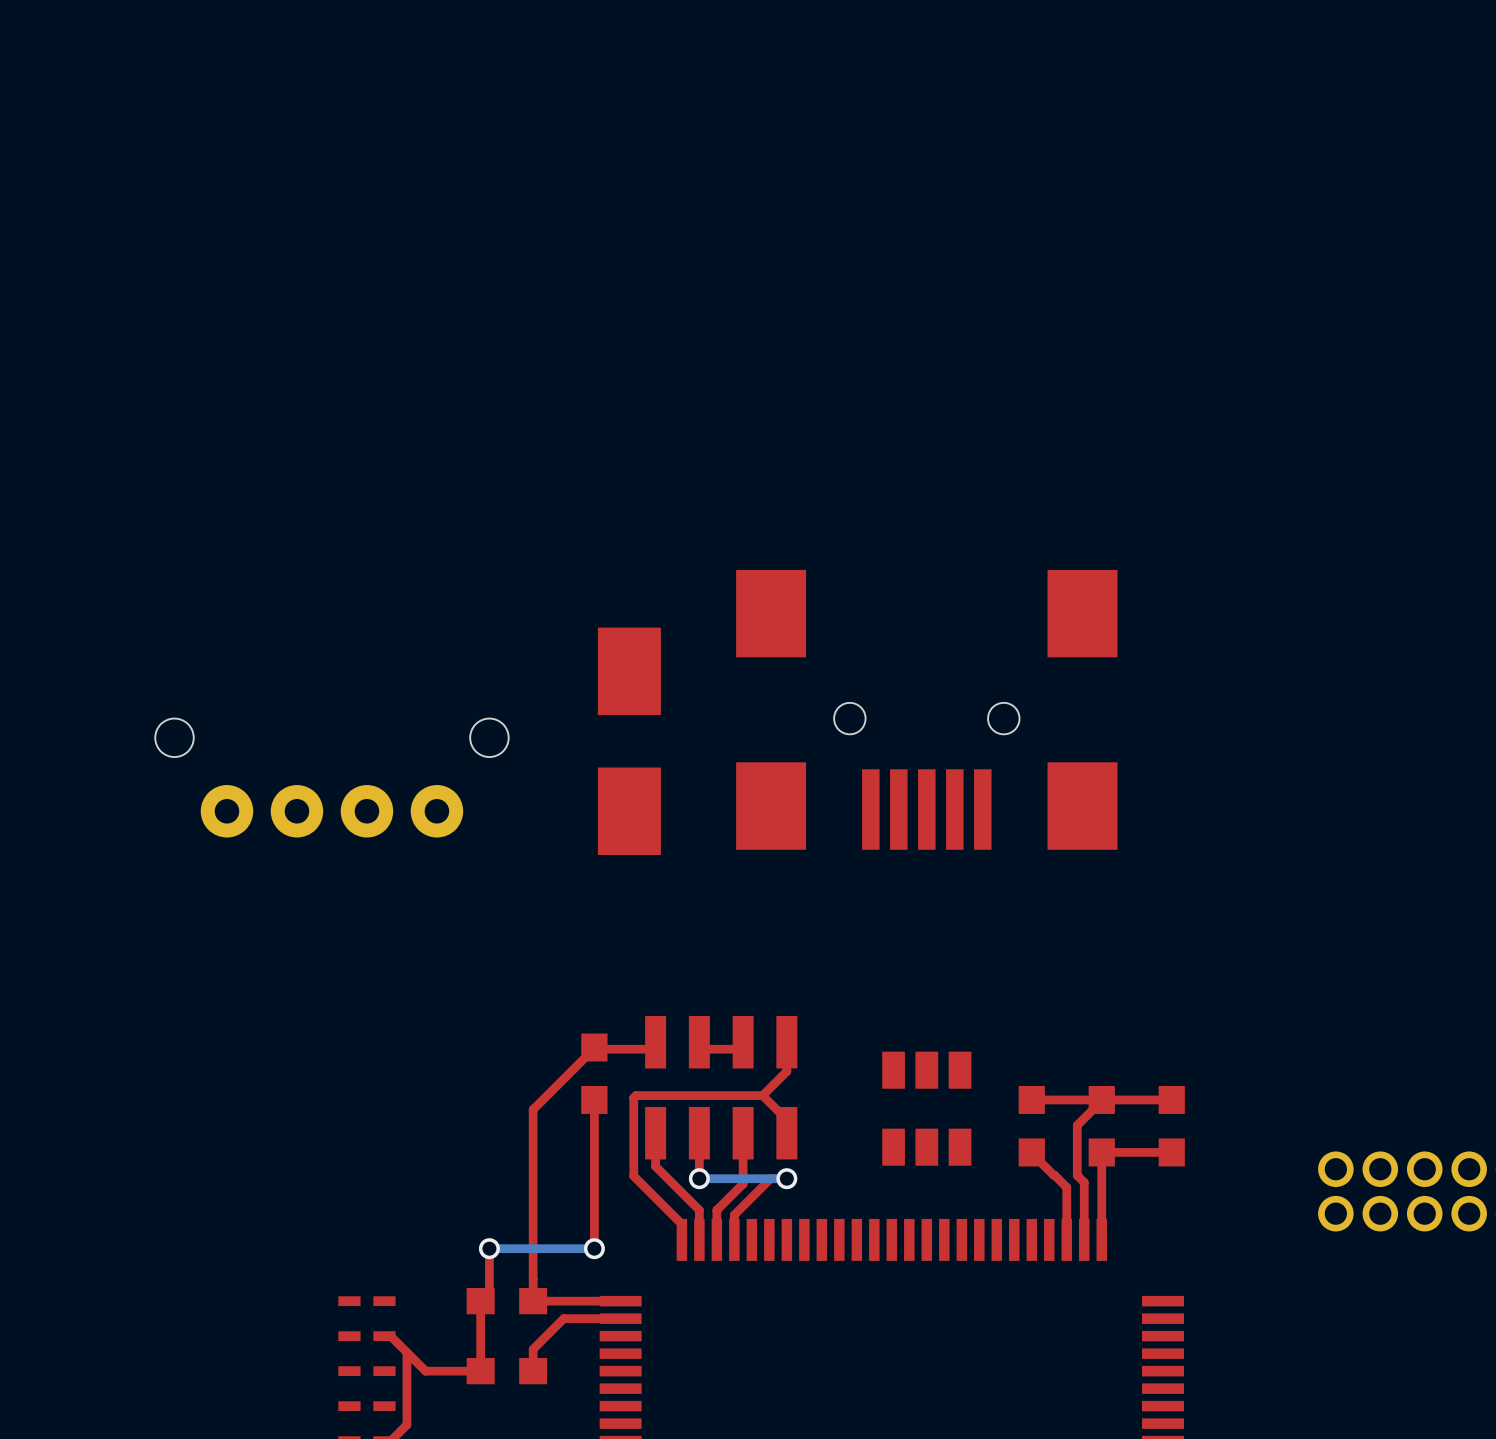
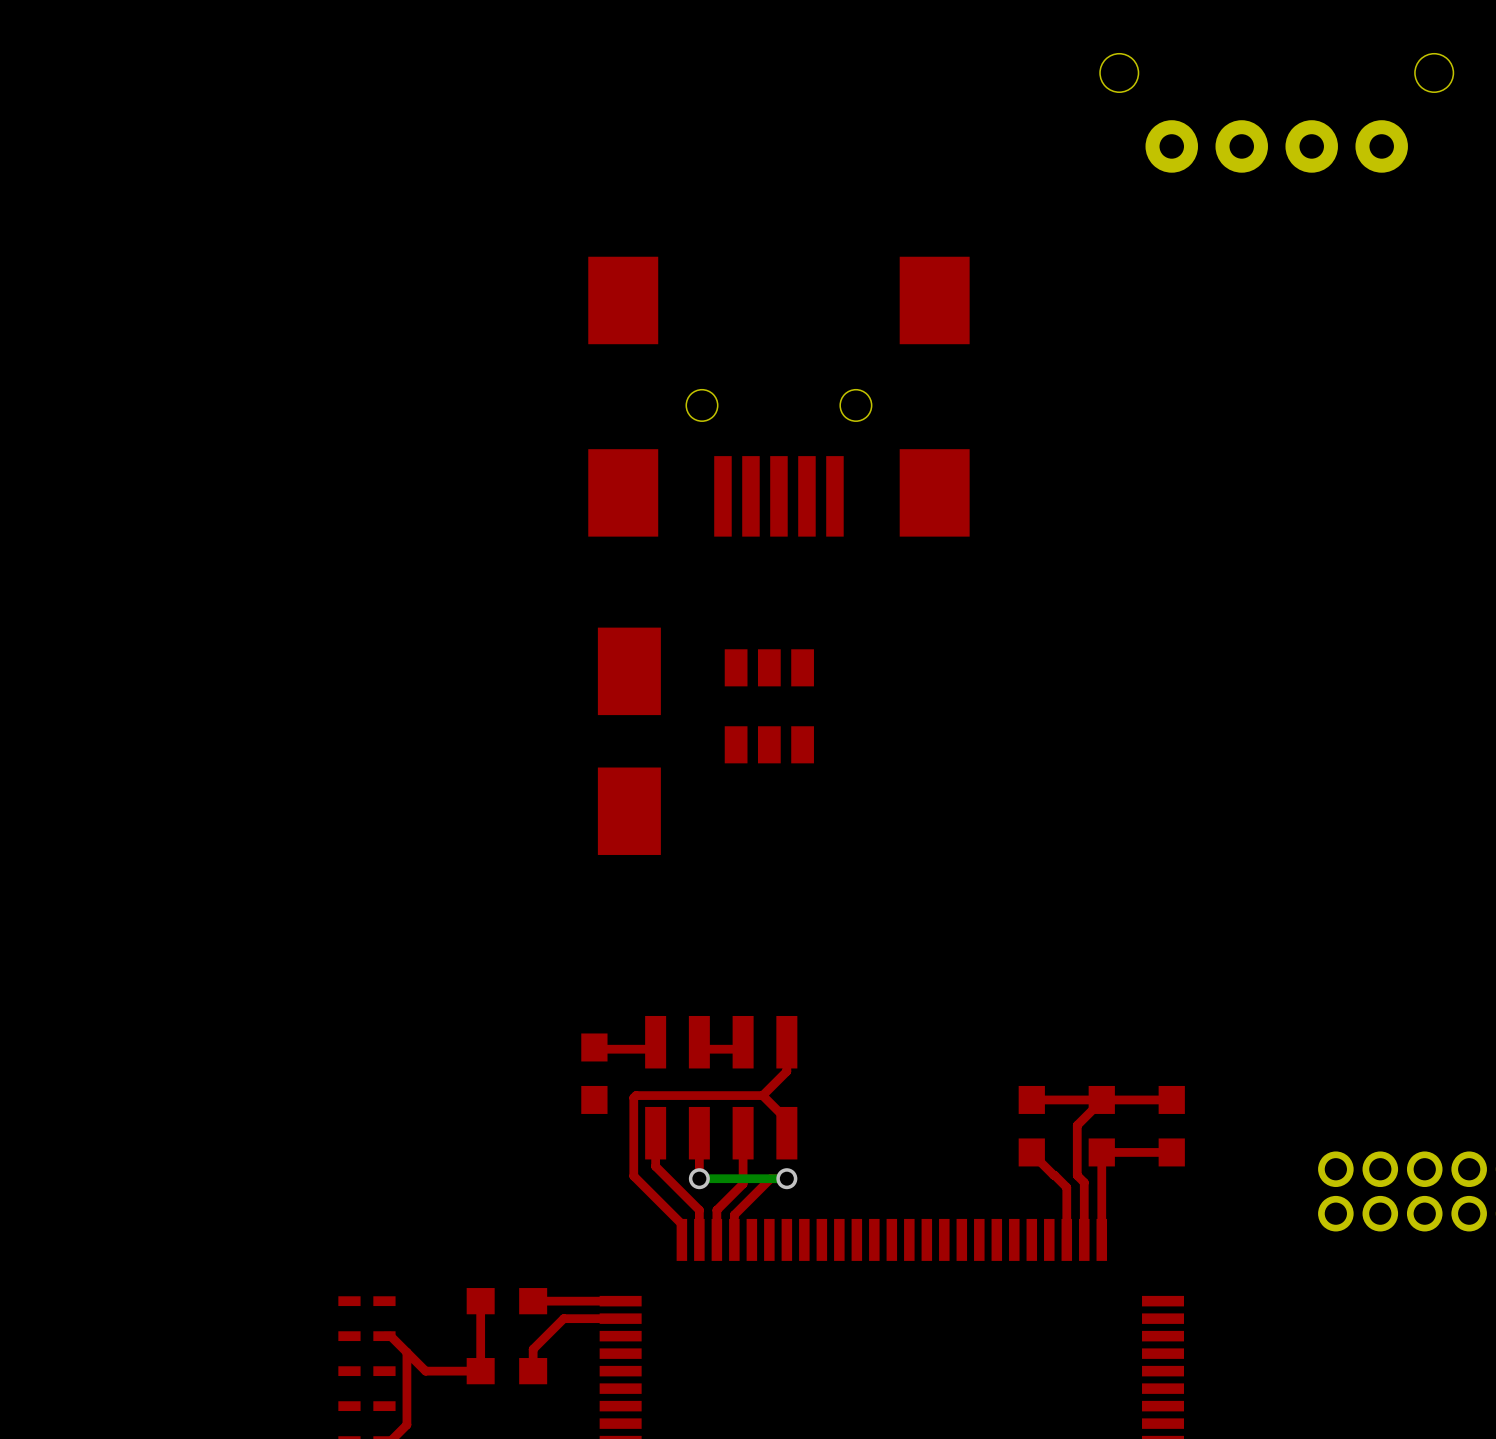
part: none -> (1276, 113)
part position: (926, 709) -> (778, 396)
part: (331, 778) -> none
top track: (594, 1047) (533, 1109) (533, 1301) -> none
top track: (594, 1099) (594, 1248) -> none
part position: (926, 1108) -> (769, 706)
top track: (489, 1248) (489, 1292) (481, 1301) -> none
via: (489, 1248) -> none
bottom track: (594, 1248) (489, 1248) -> none
via: (594, 1248) -> none

